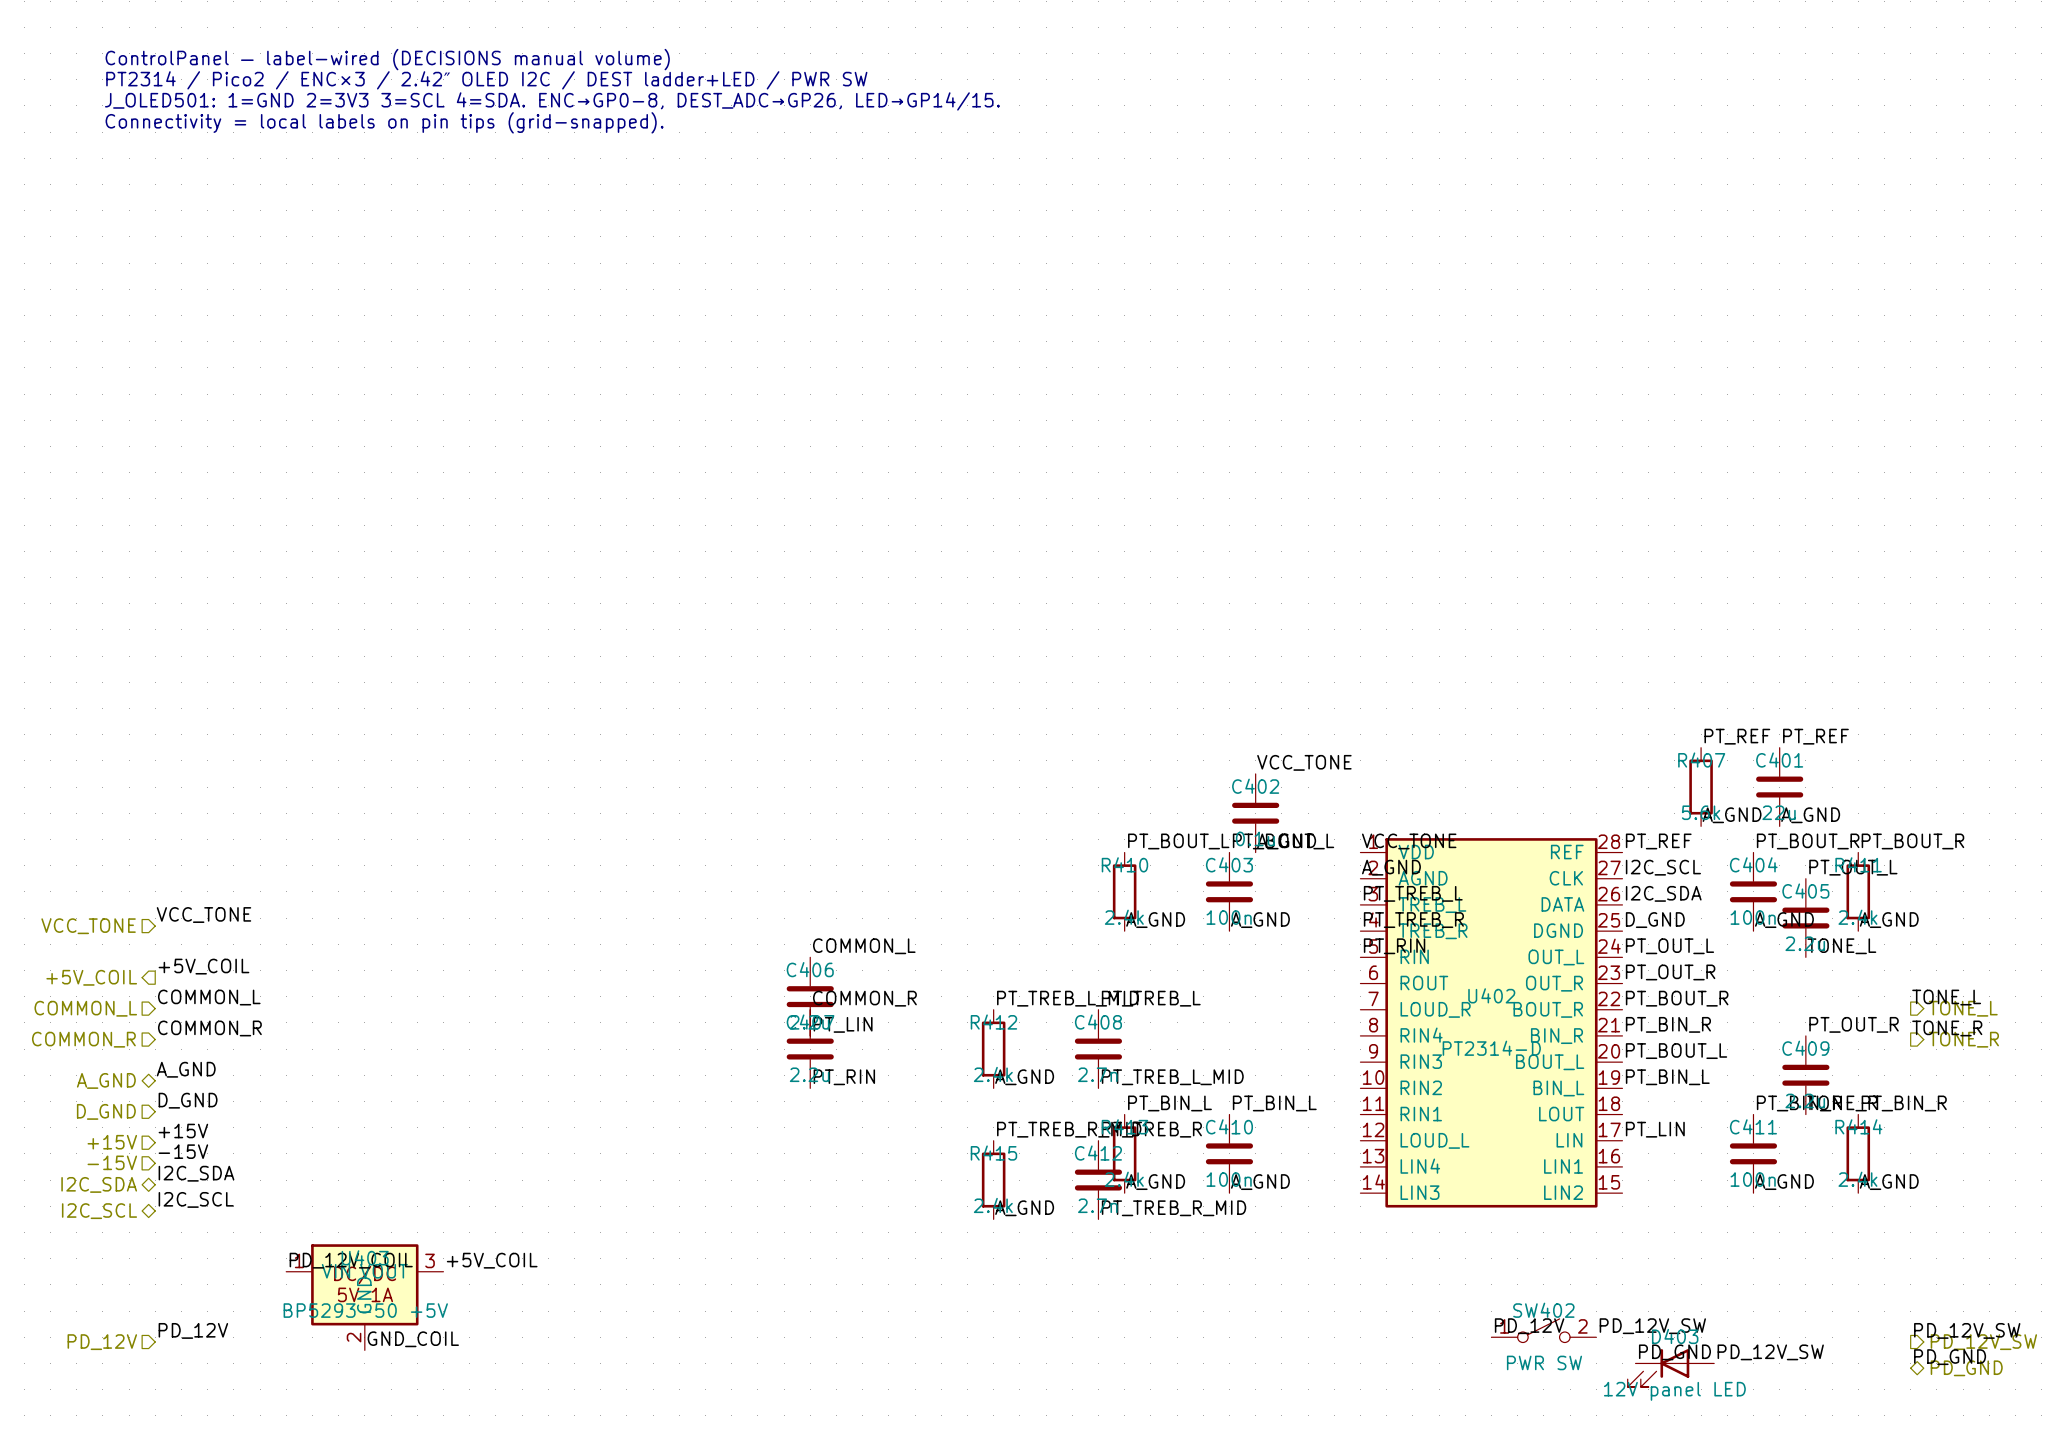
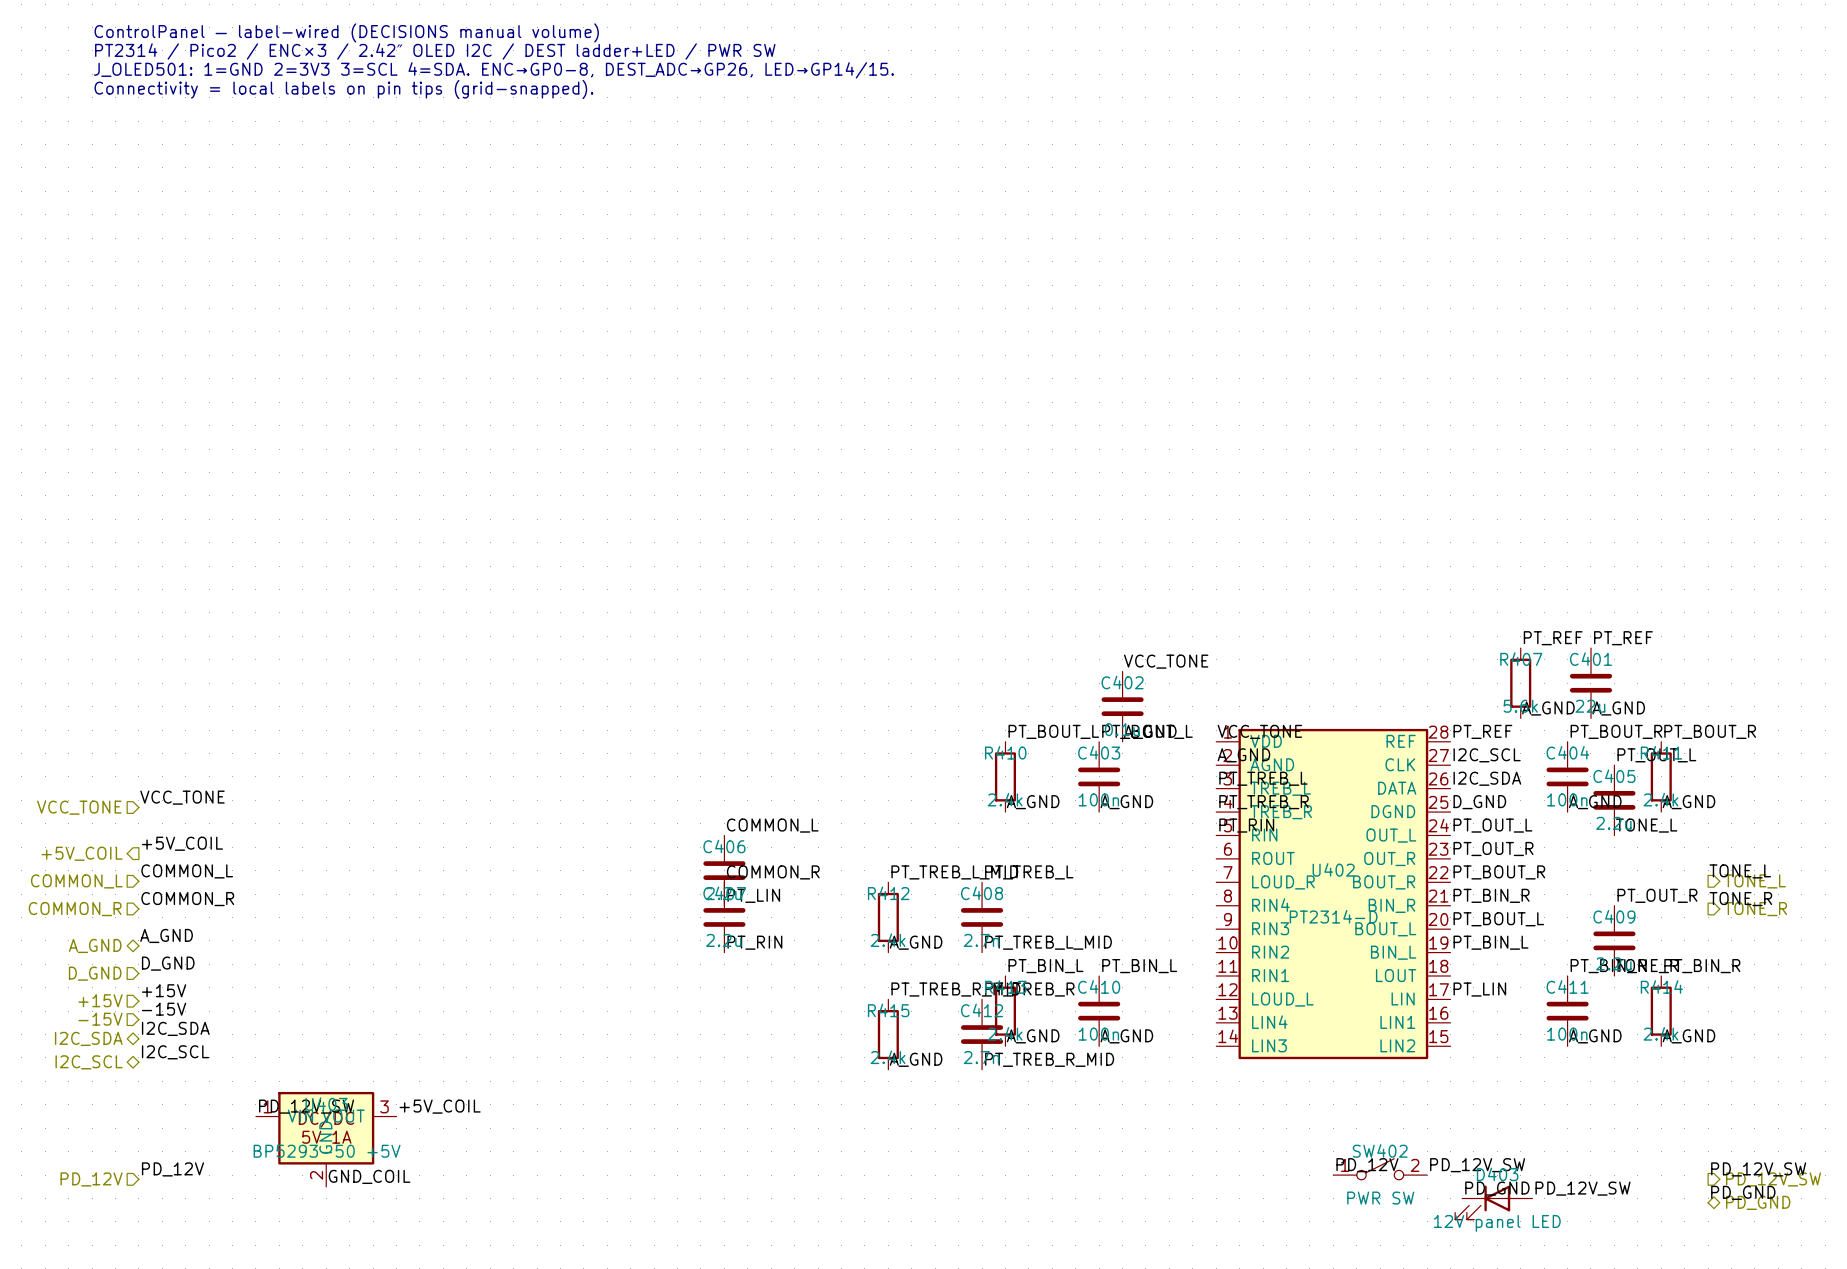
label: PD_12V_COIL (351, 1260) -> PD_12V_SW (306, 1106)

